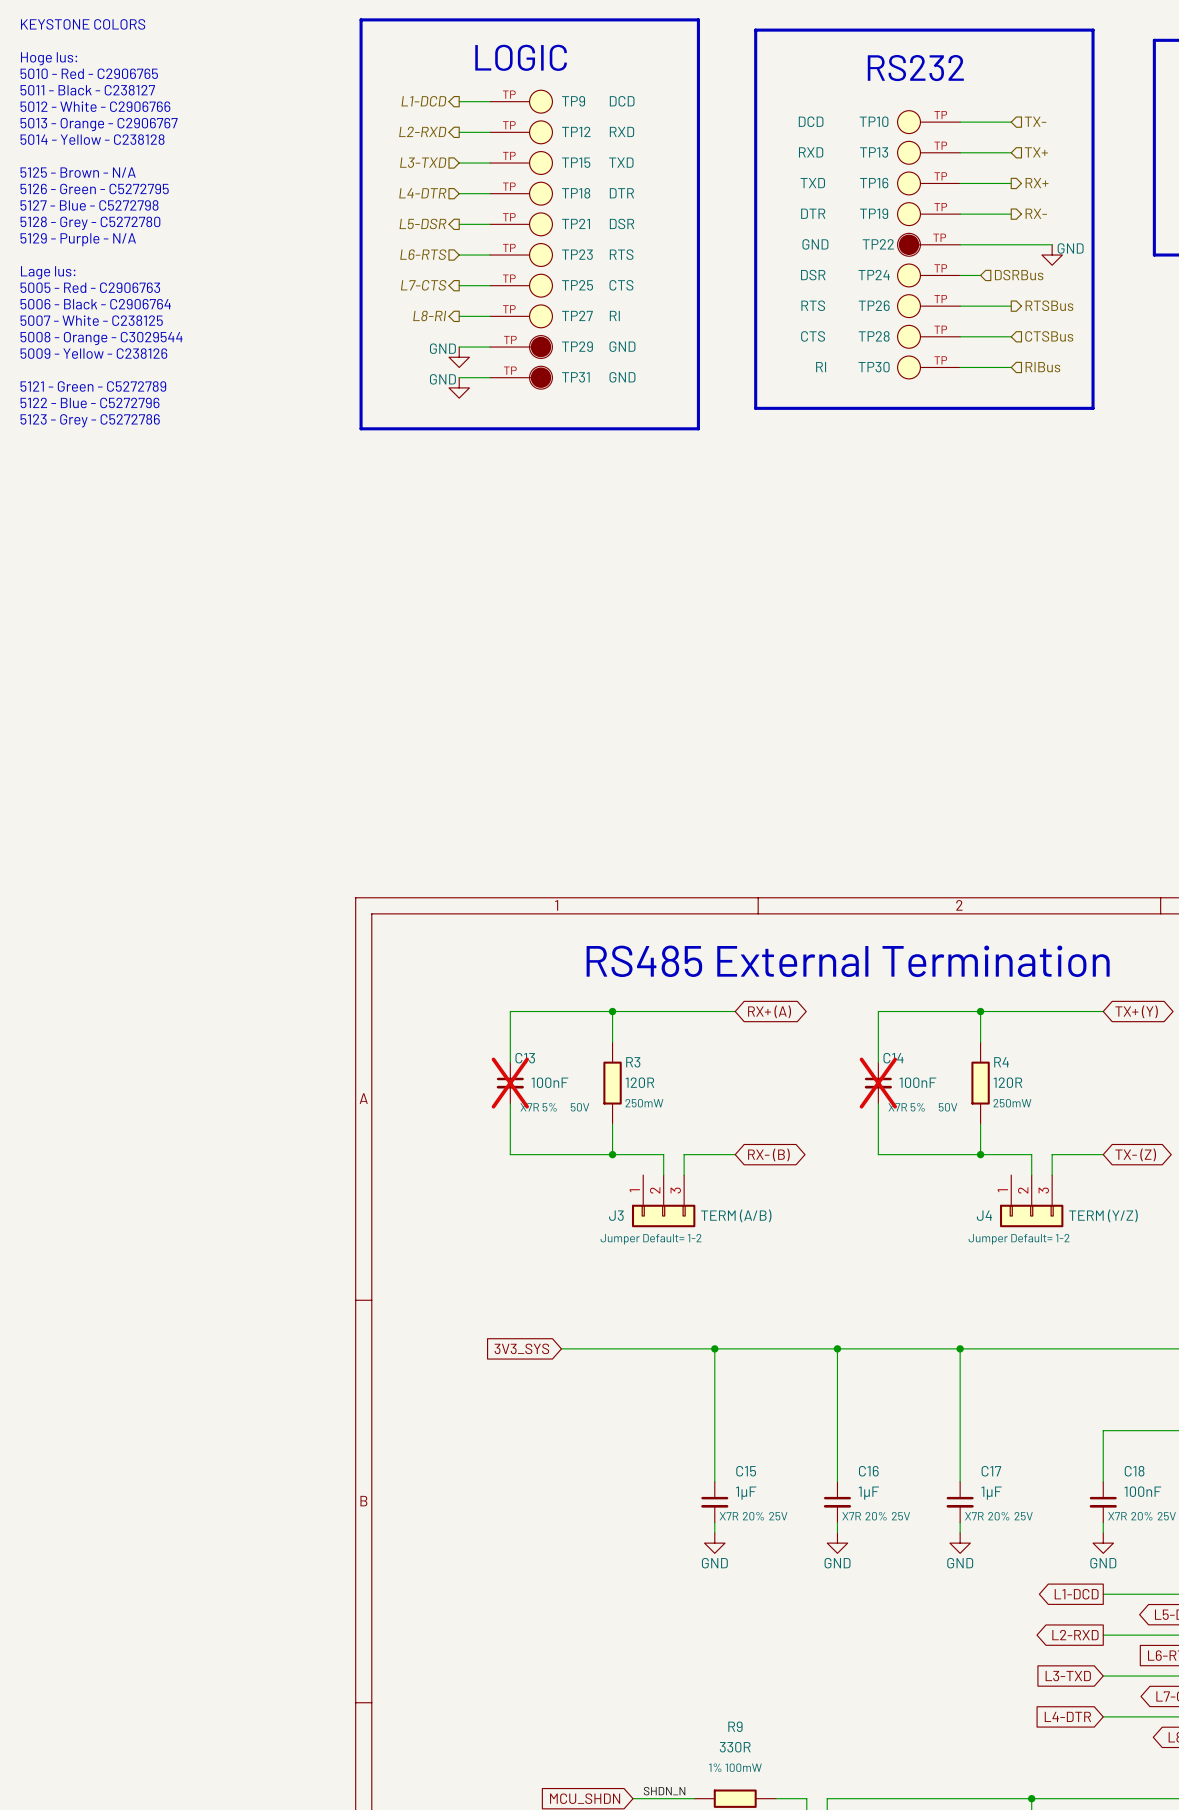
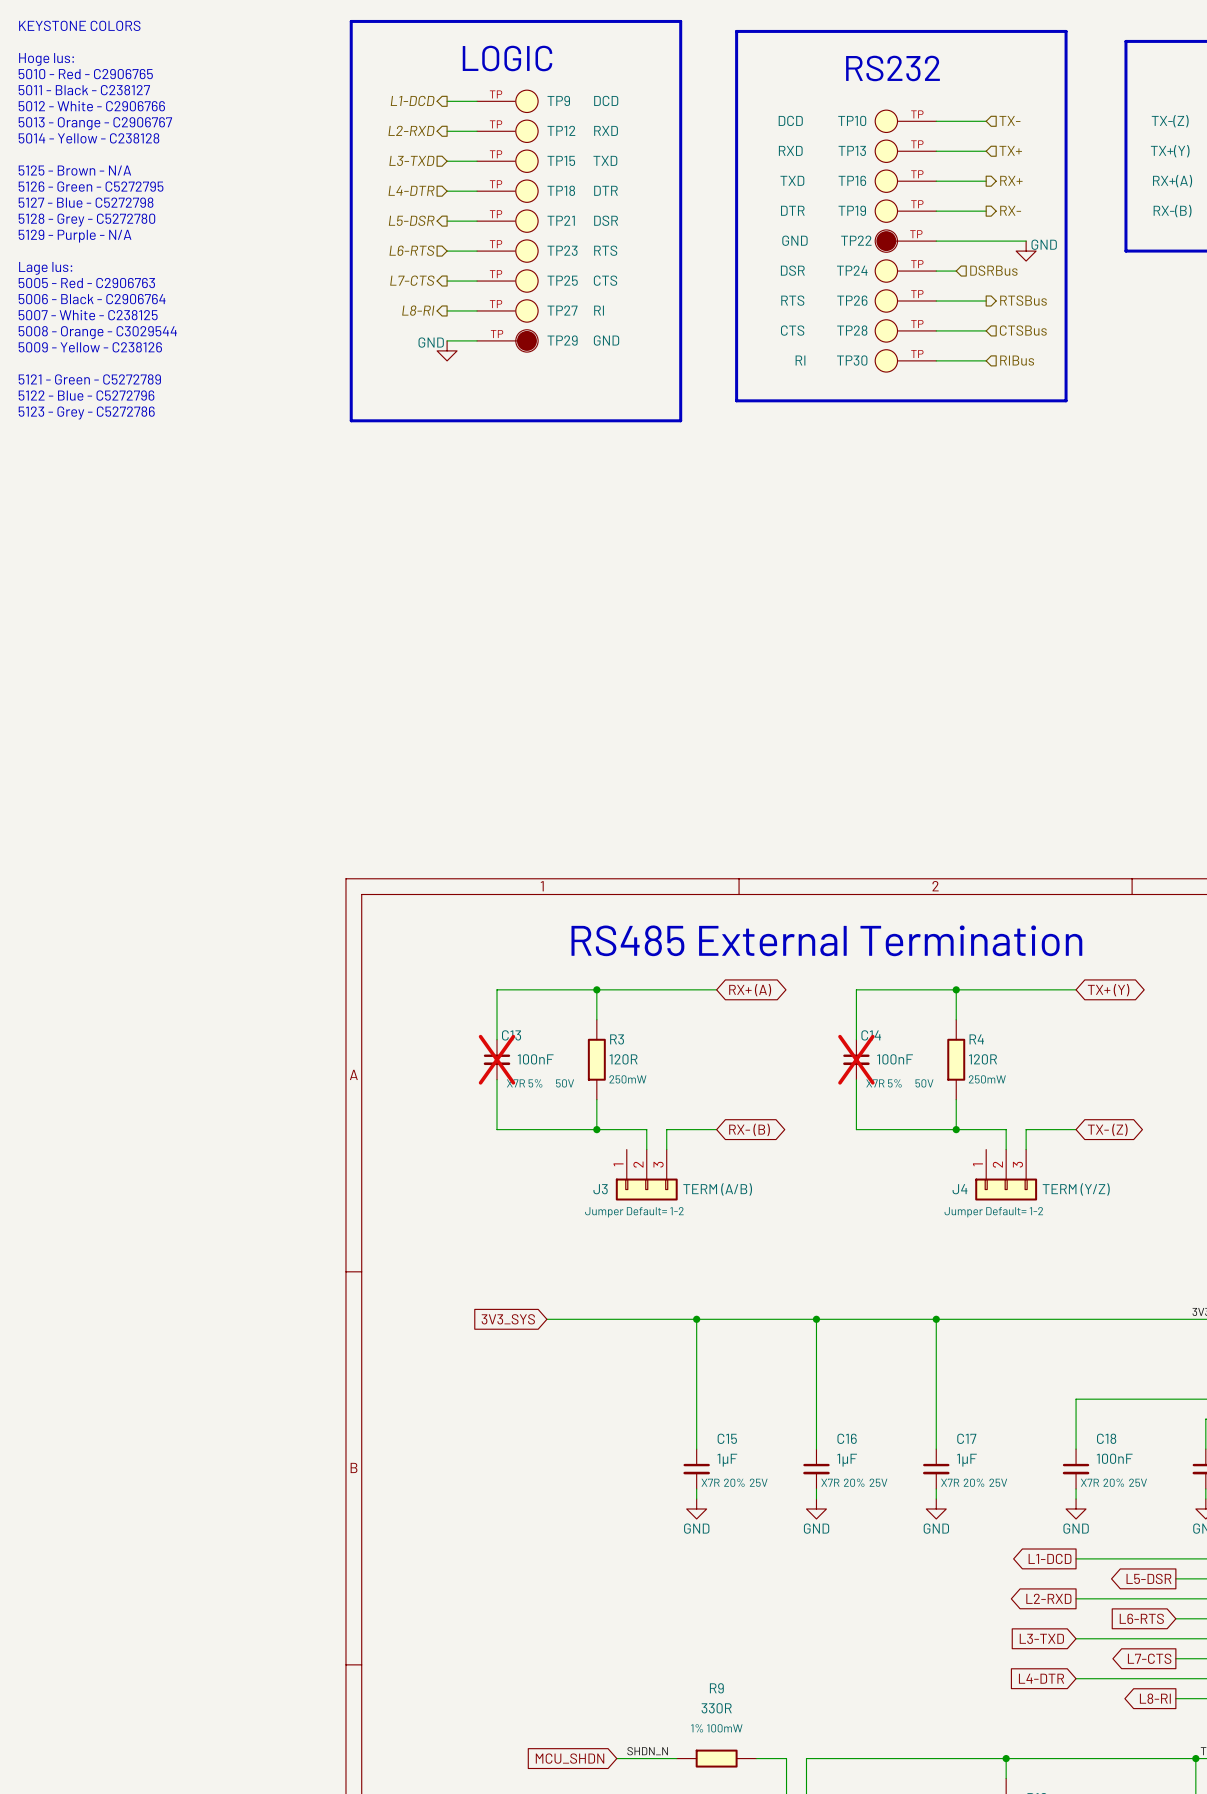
wire: (459, 377) (489, 377) -> none
TP31: GND (521, 377) -> none
power symbol: GND (459, 387) -> none

